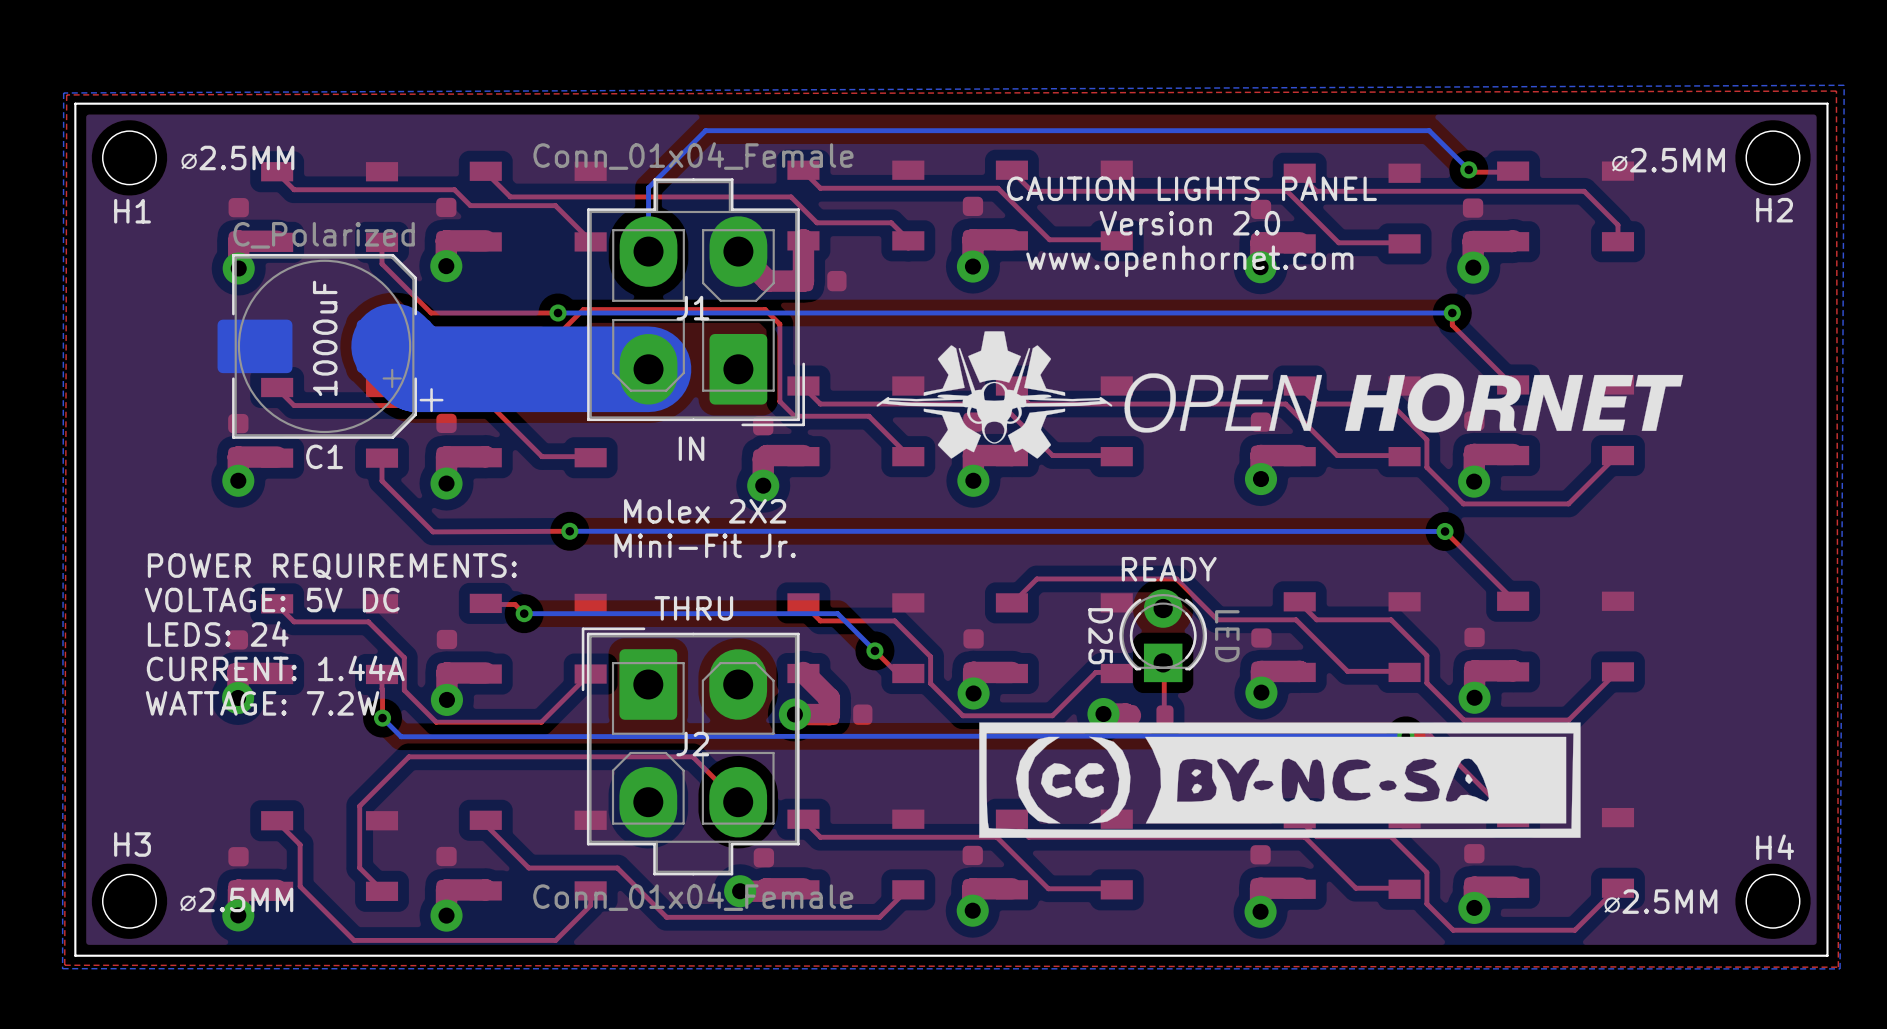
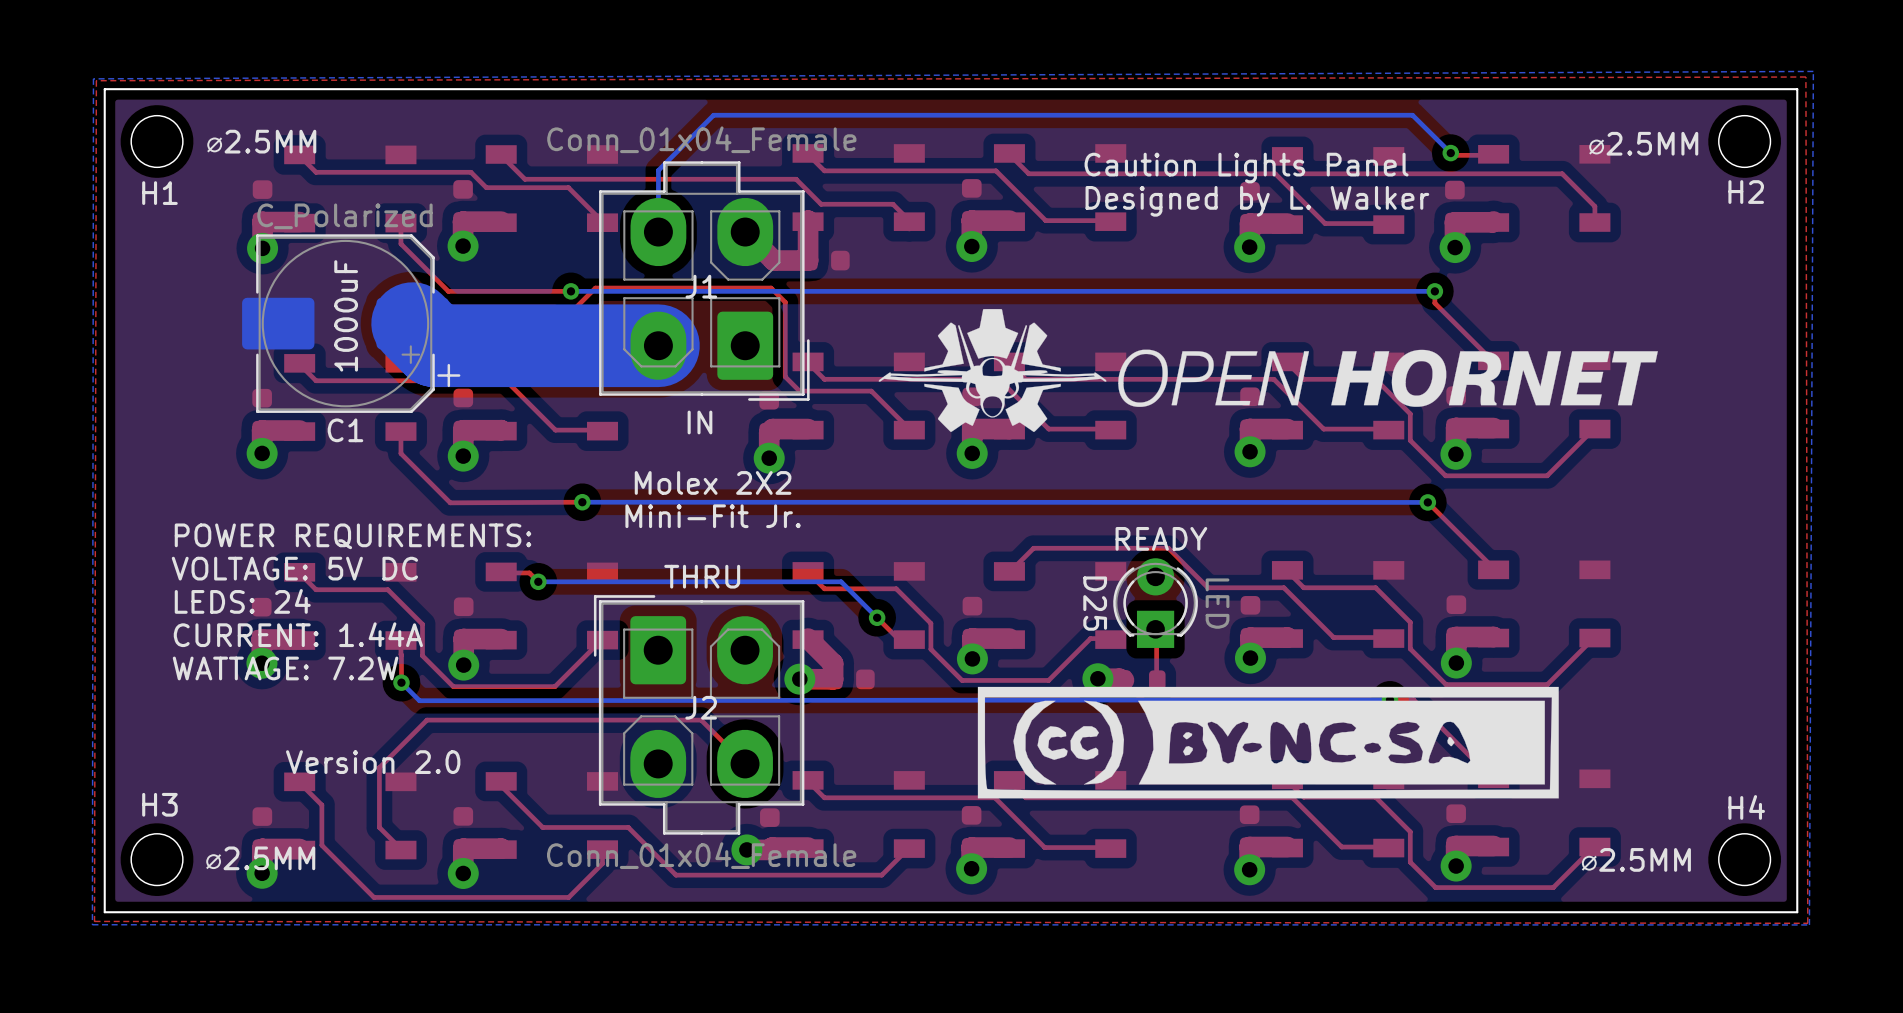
text: none -> Caution Lights Panel (1246, 168)
text: CAUTION LIGHTS PANEL (1191, 188) -> none
text: none -> Designed by L. Walker (1257, 201)
text: Version 2.0 (1189, 223) -> none
text: www.openhornet.com (1189, 261) -> none
text: none -> Version 2.0 (373, 762)

